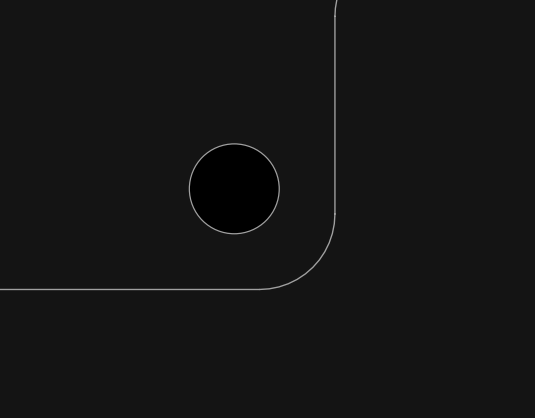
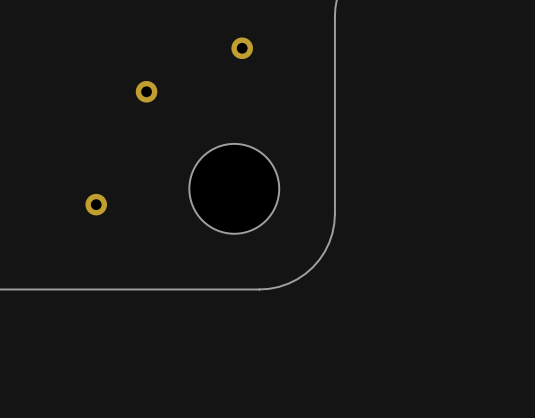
via: none -> (242, 48)
via: none -> (146, 91)
via: none -> (96, 204)

